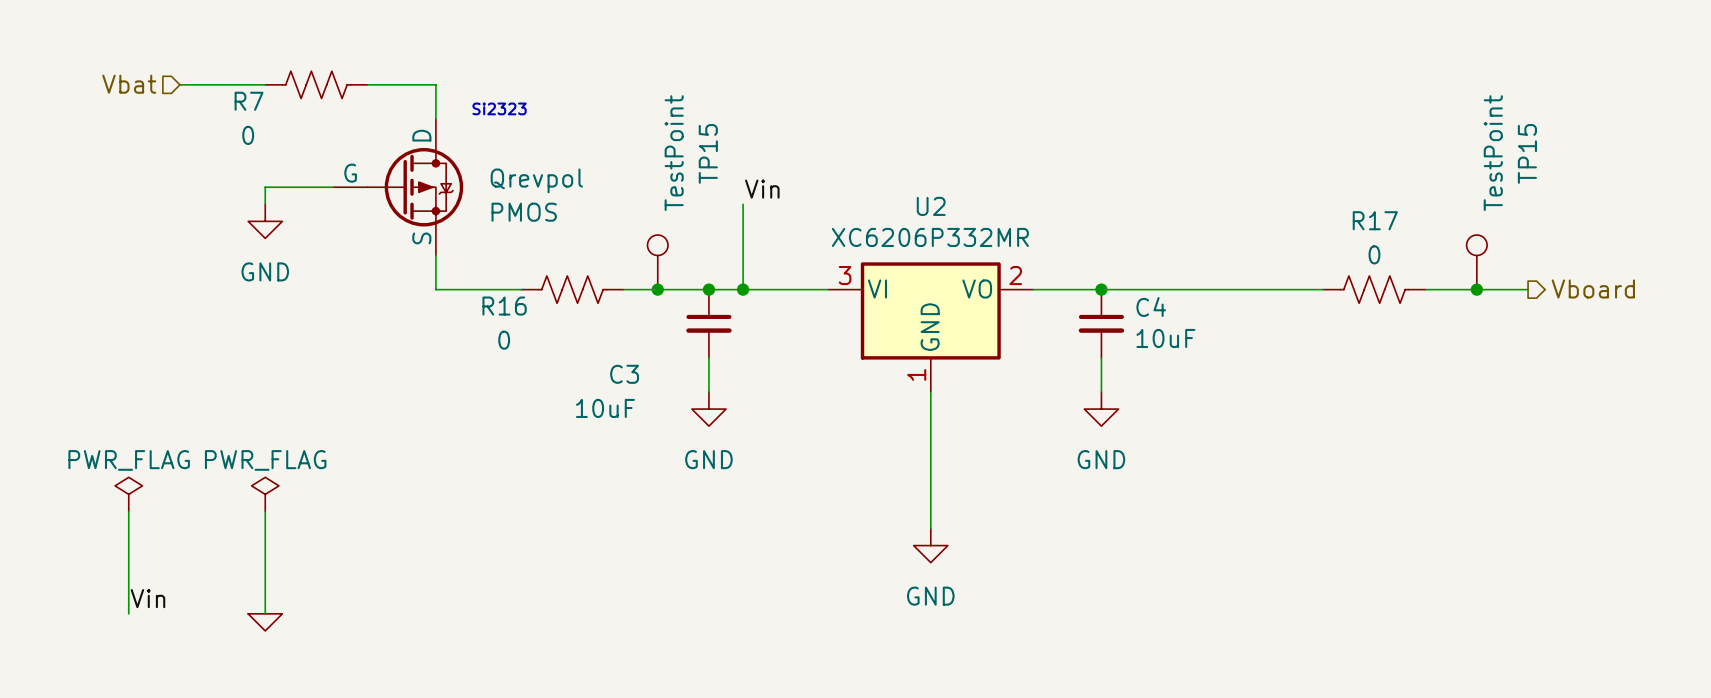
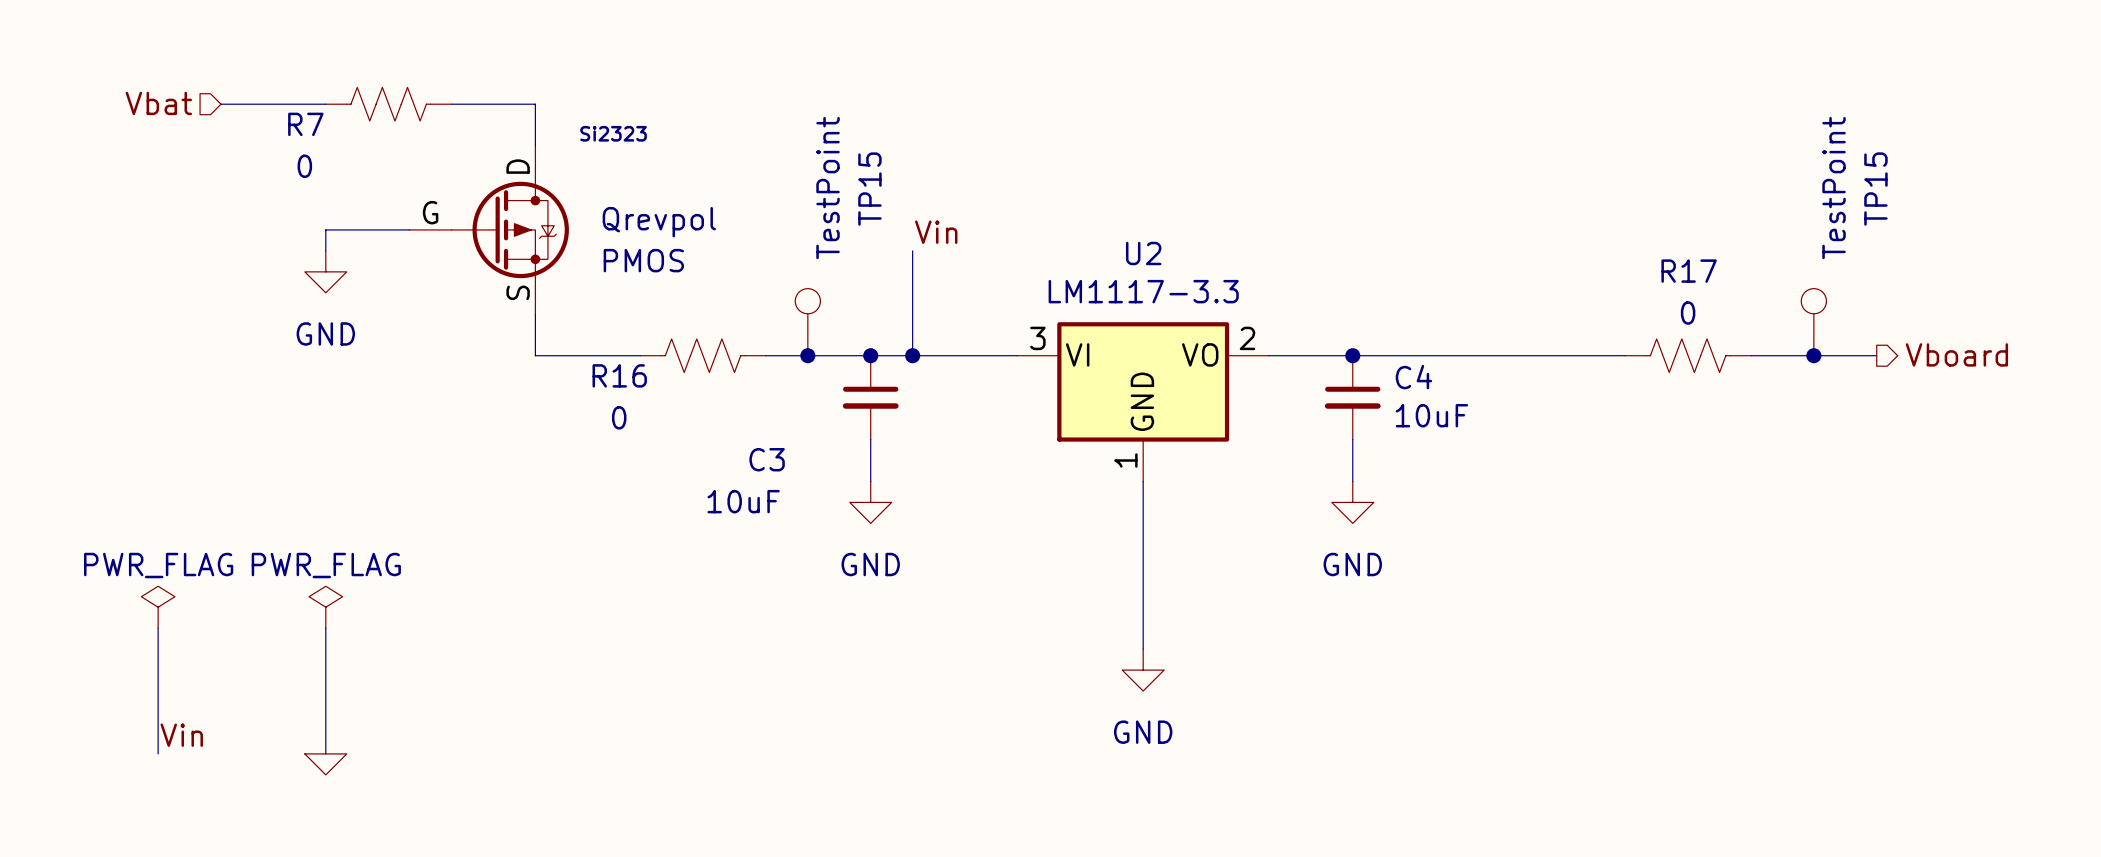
U2 value: XC6206P332MR (930, 237) -> LM1117-3.3 (1143, 291)

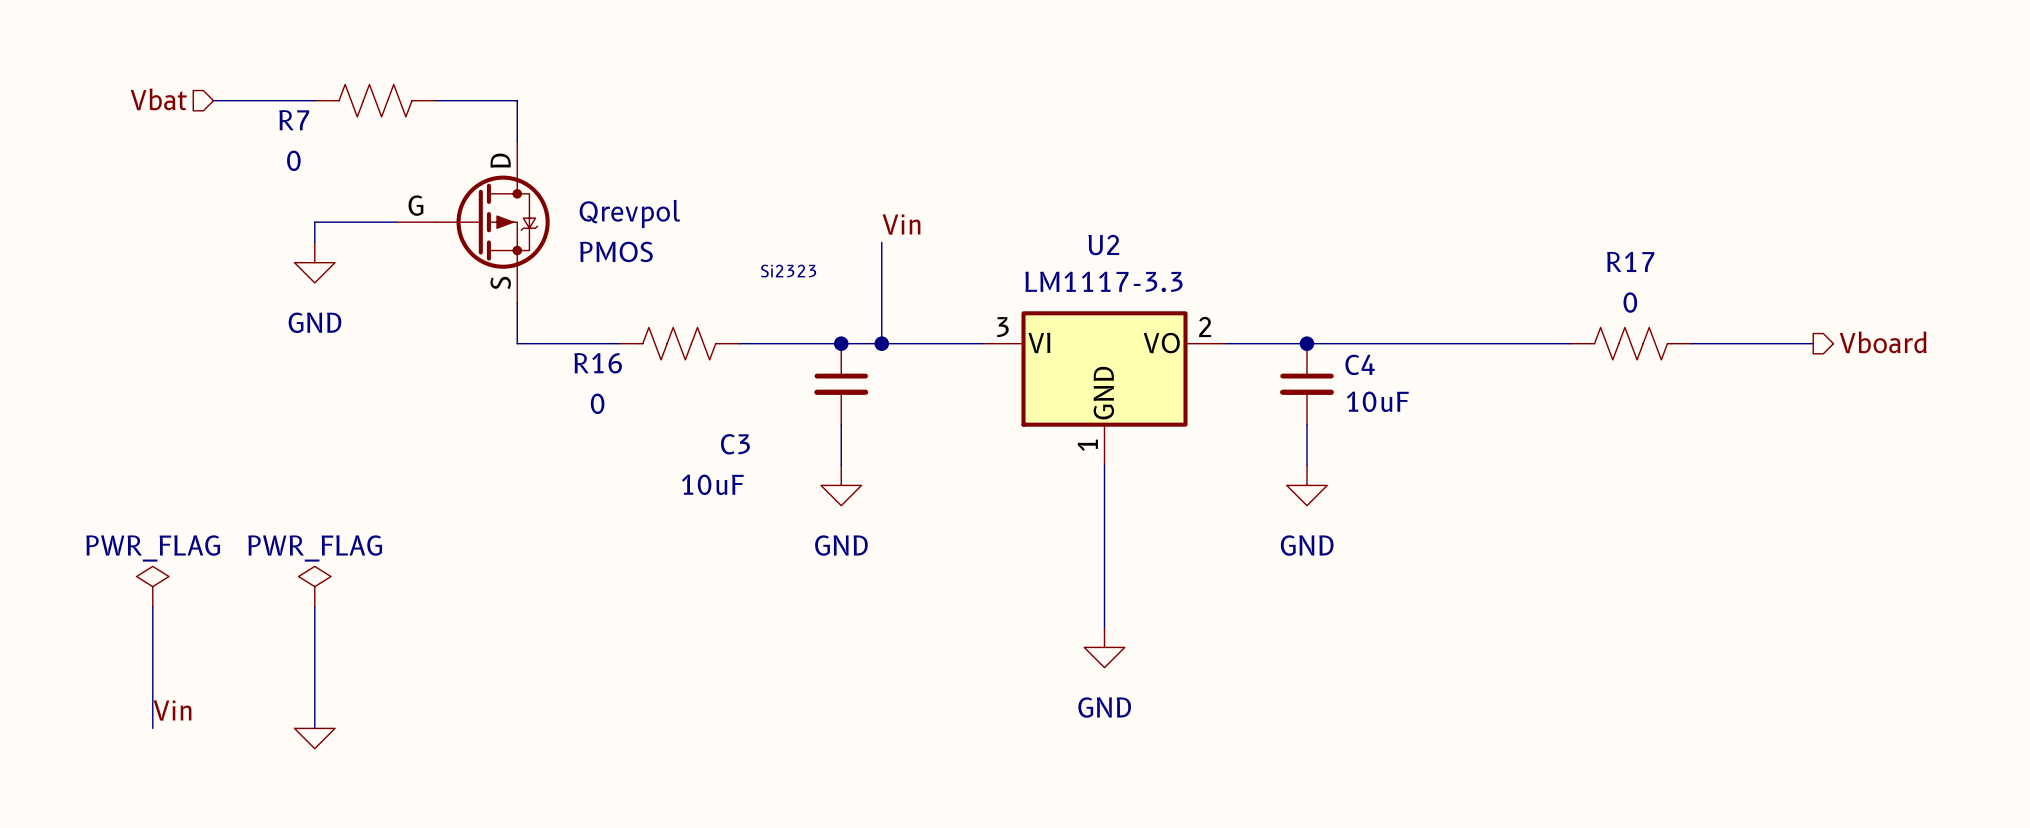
text position: Si2323 (613, 133) -> Si2323 (788, 271)
TP15: TestPoint (807, 322) -> none
TP15: TestPoint (1813, 322) -> none
junction: (807, 355) -> none
junction: (1813, 355) -> none

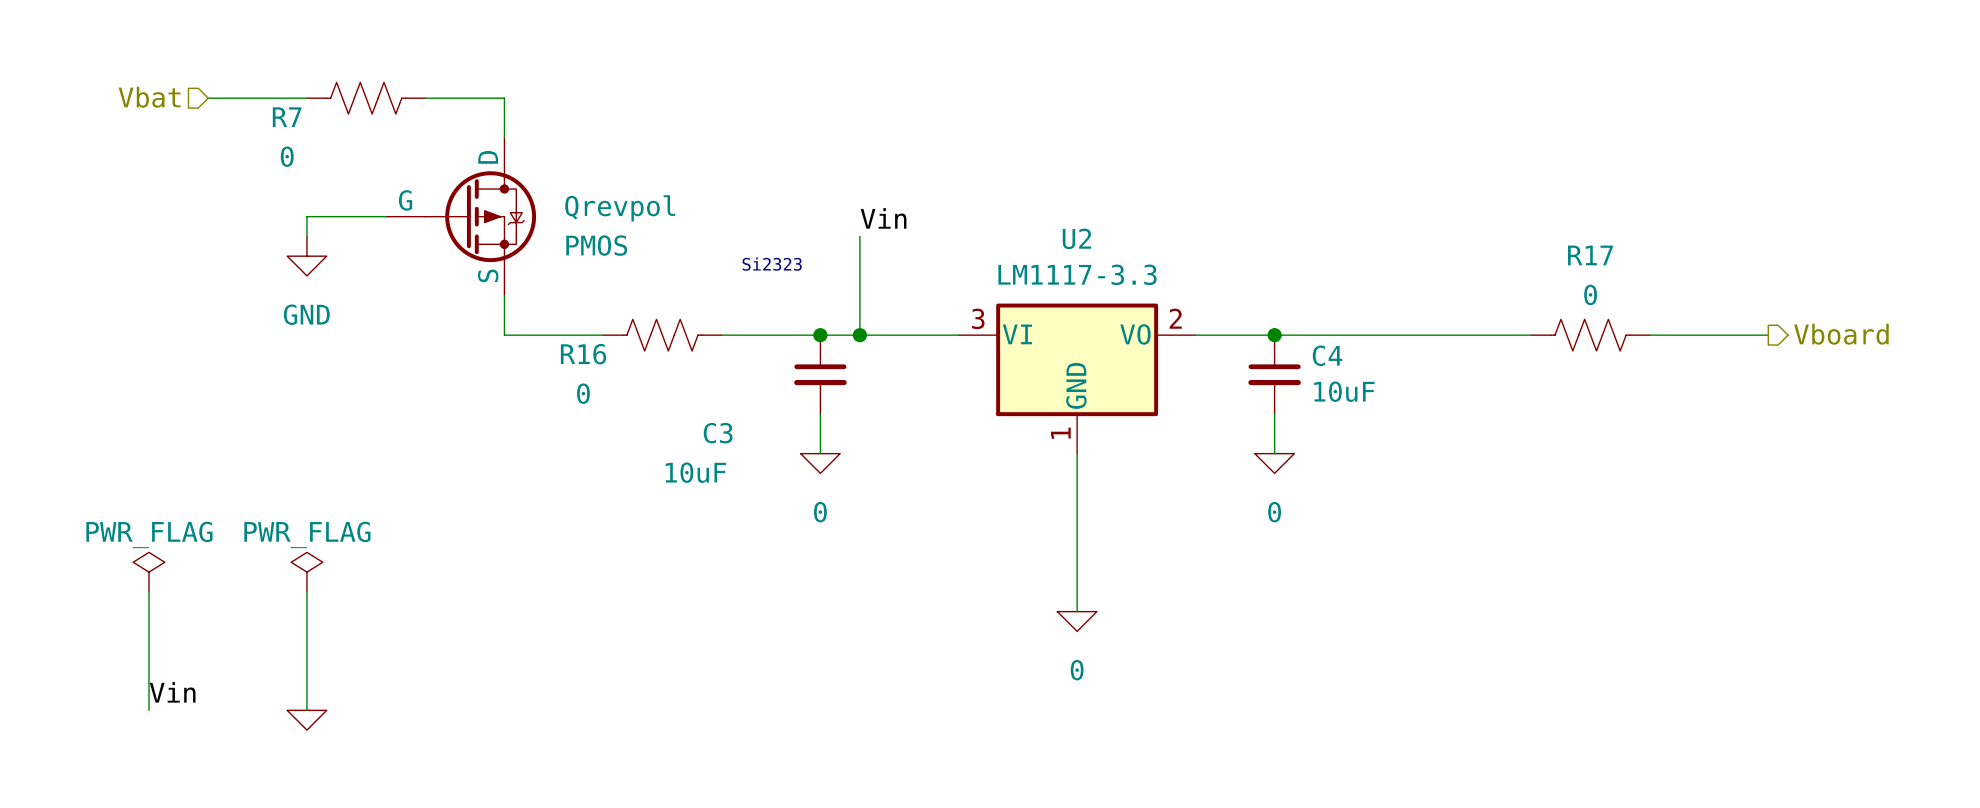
power symbol: GND (841, 485) -> 0 (820, 463)
power symbol: GND (1306, 485) -> 0 (1274, 463)
power symbol: GND (1104, 647) -> 0 (1077, 621)

